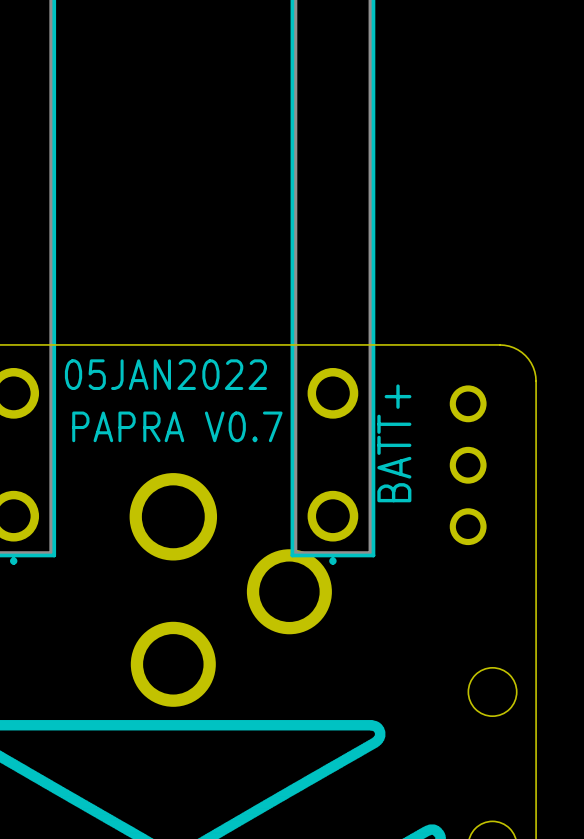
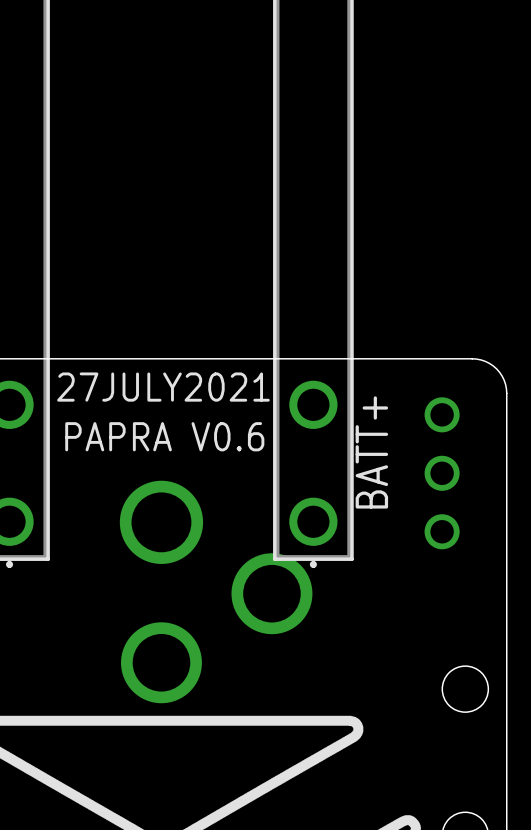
text: 05JAN2022 (165, 374) -> 27JULY2021 (163, 387)
text: PAPRA V0.7 (177, 426) -> PAPRA V0.6 (164, 436)

